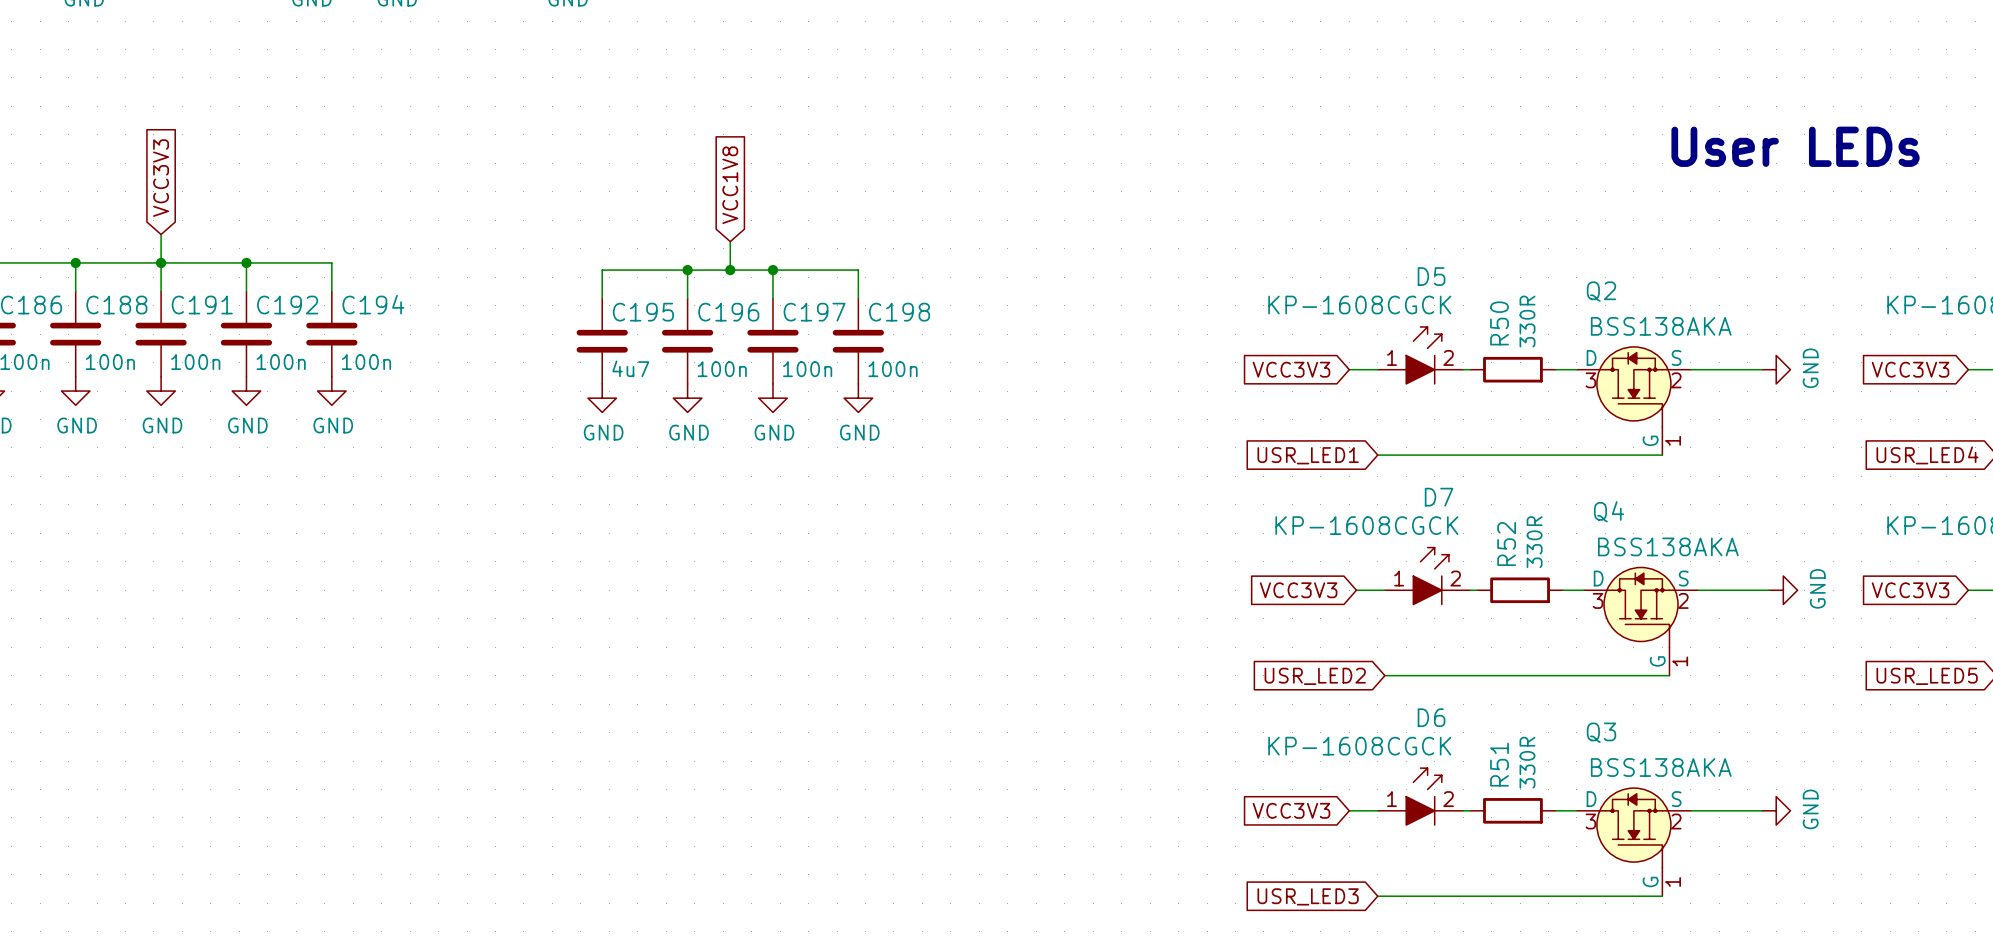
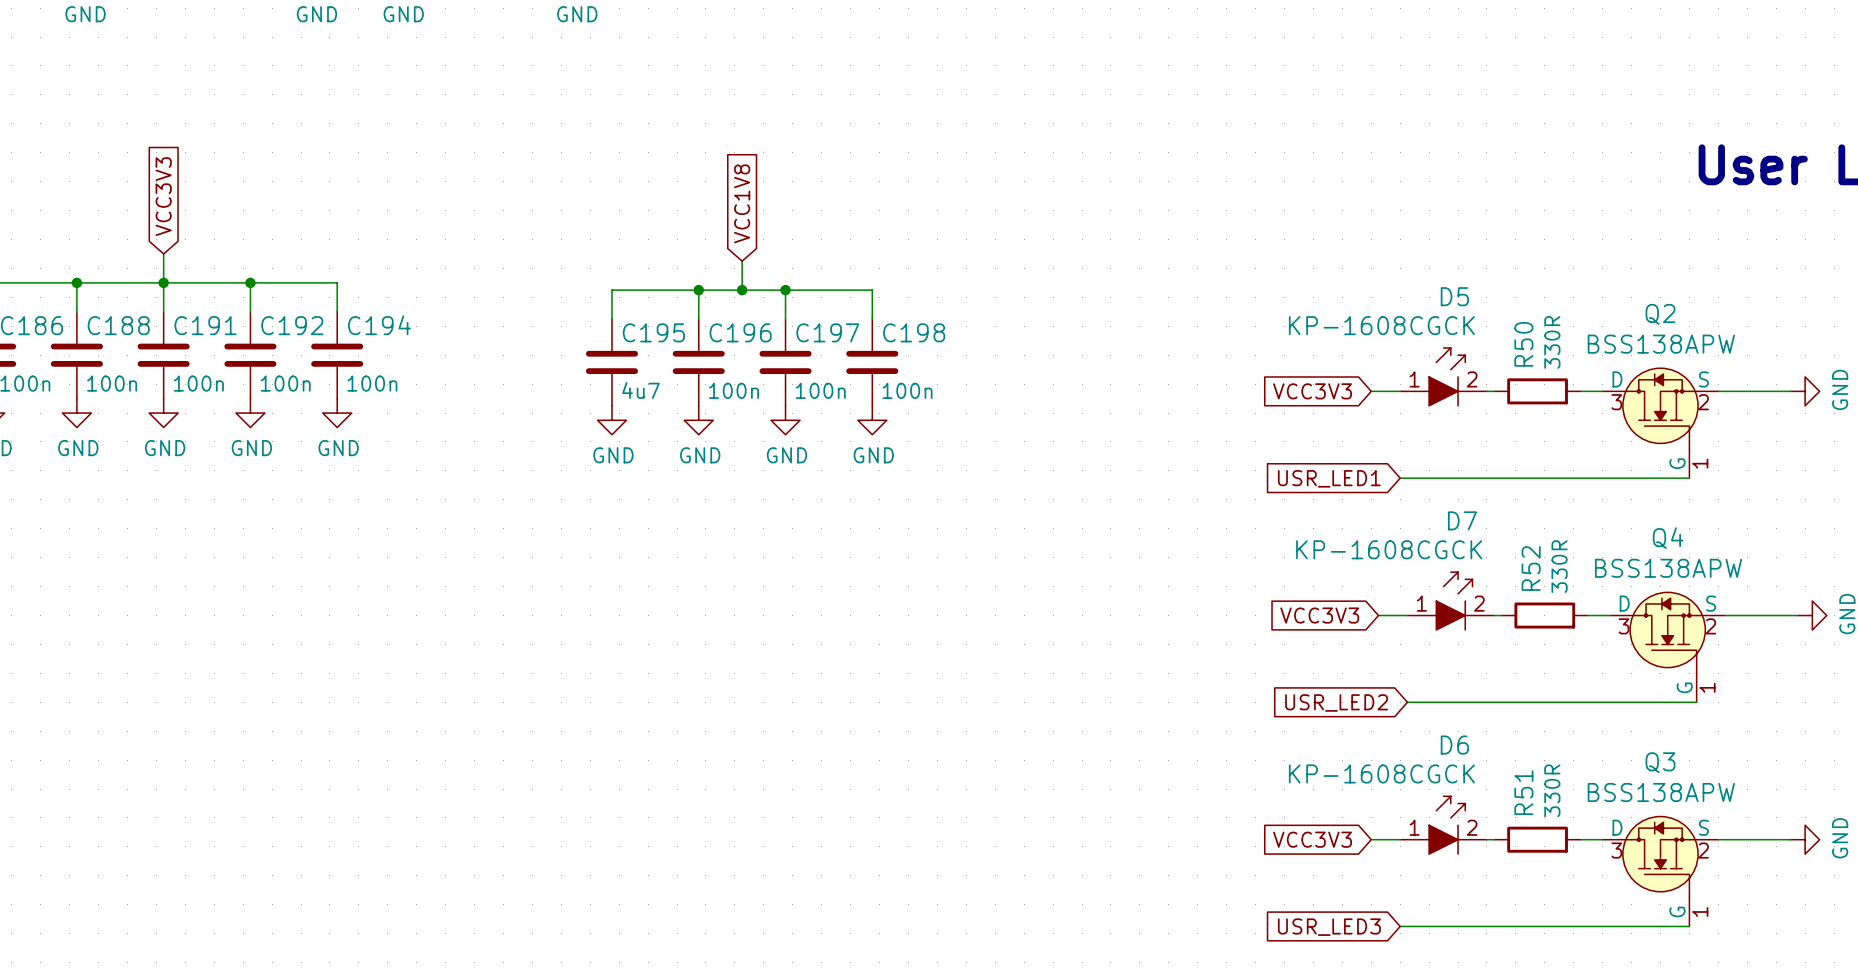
Q2 name position: Q2 (1601, 291) -> Q2 (1660, 314)
Q2 value: BSS138AKA (1661, 326) -> BSS138APW (1661, 344)
Q4 name position: Q4 (1609, 511) -> Q4 (1668, 538)
Q4 value: BSS138AKA (1668, 546) -> BSS138APW (1668, 568)
Q3 name position: Q3 (1601, 732) -> Q3 (1660, 762)
Q3 value: BSS138AKA (1661, 767) -> BSS138APW (1661, 792)

